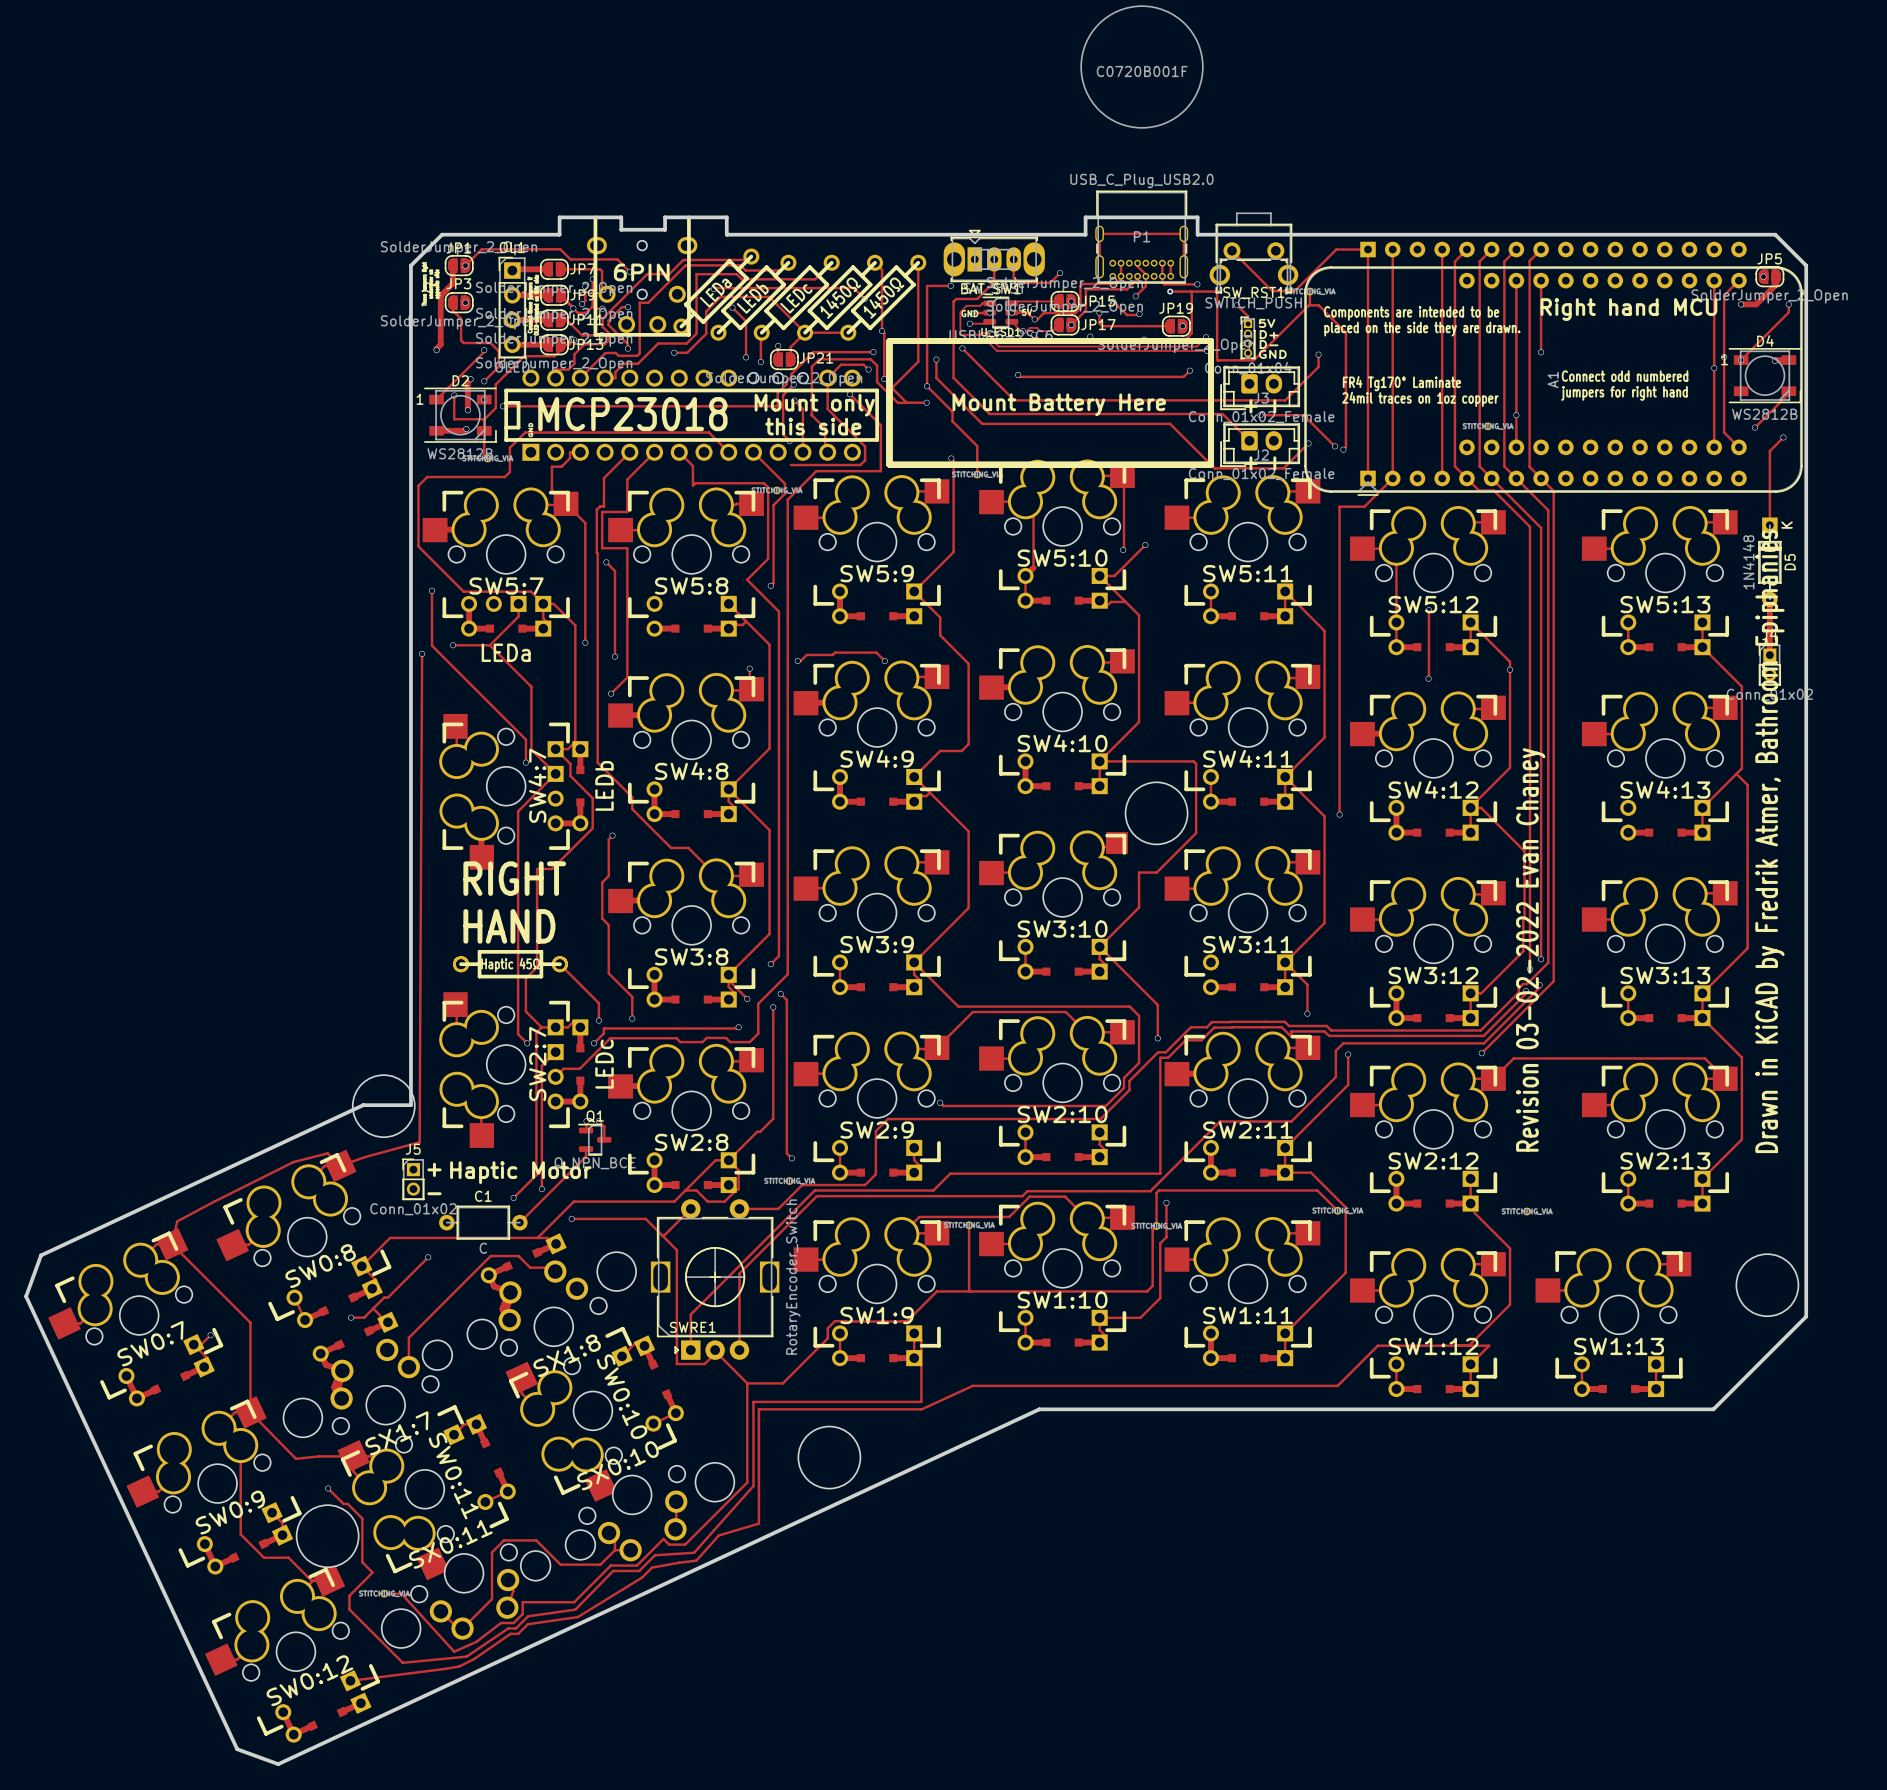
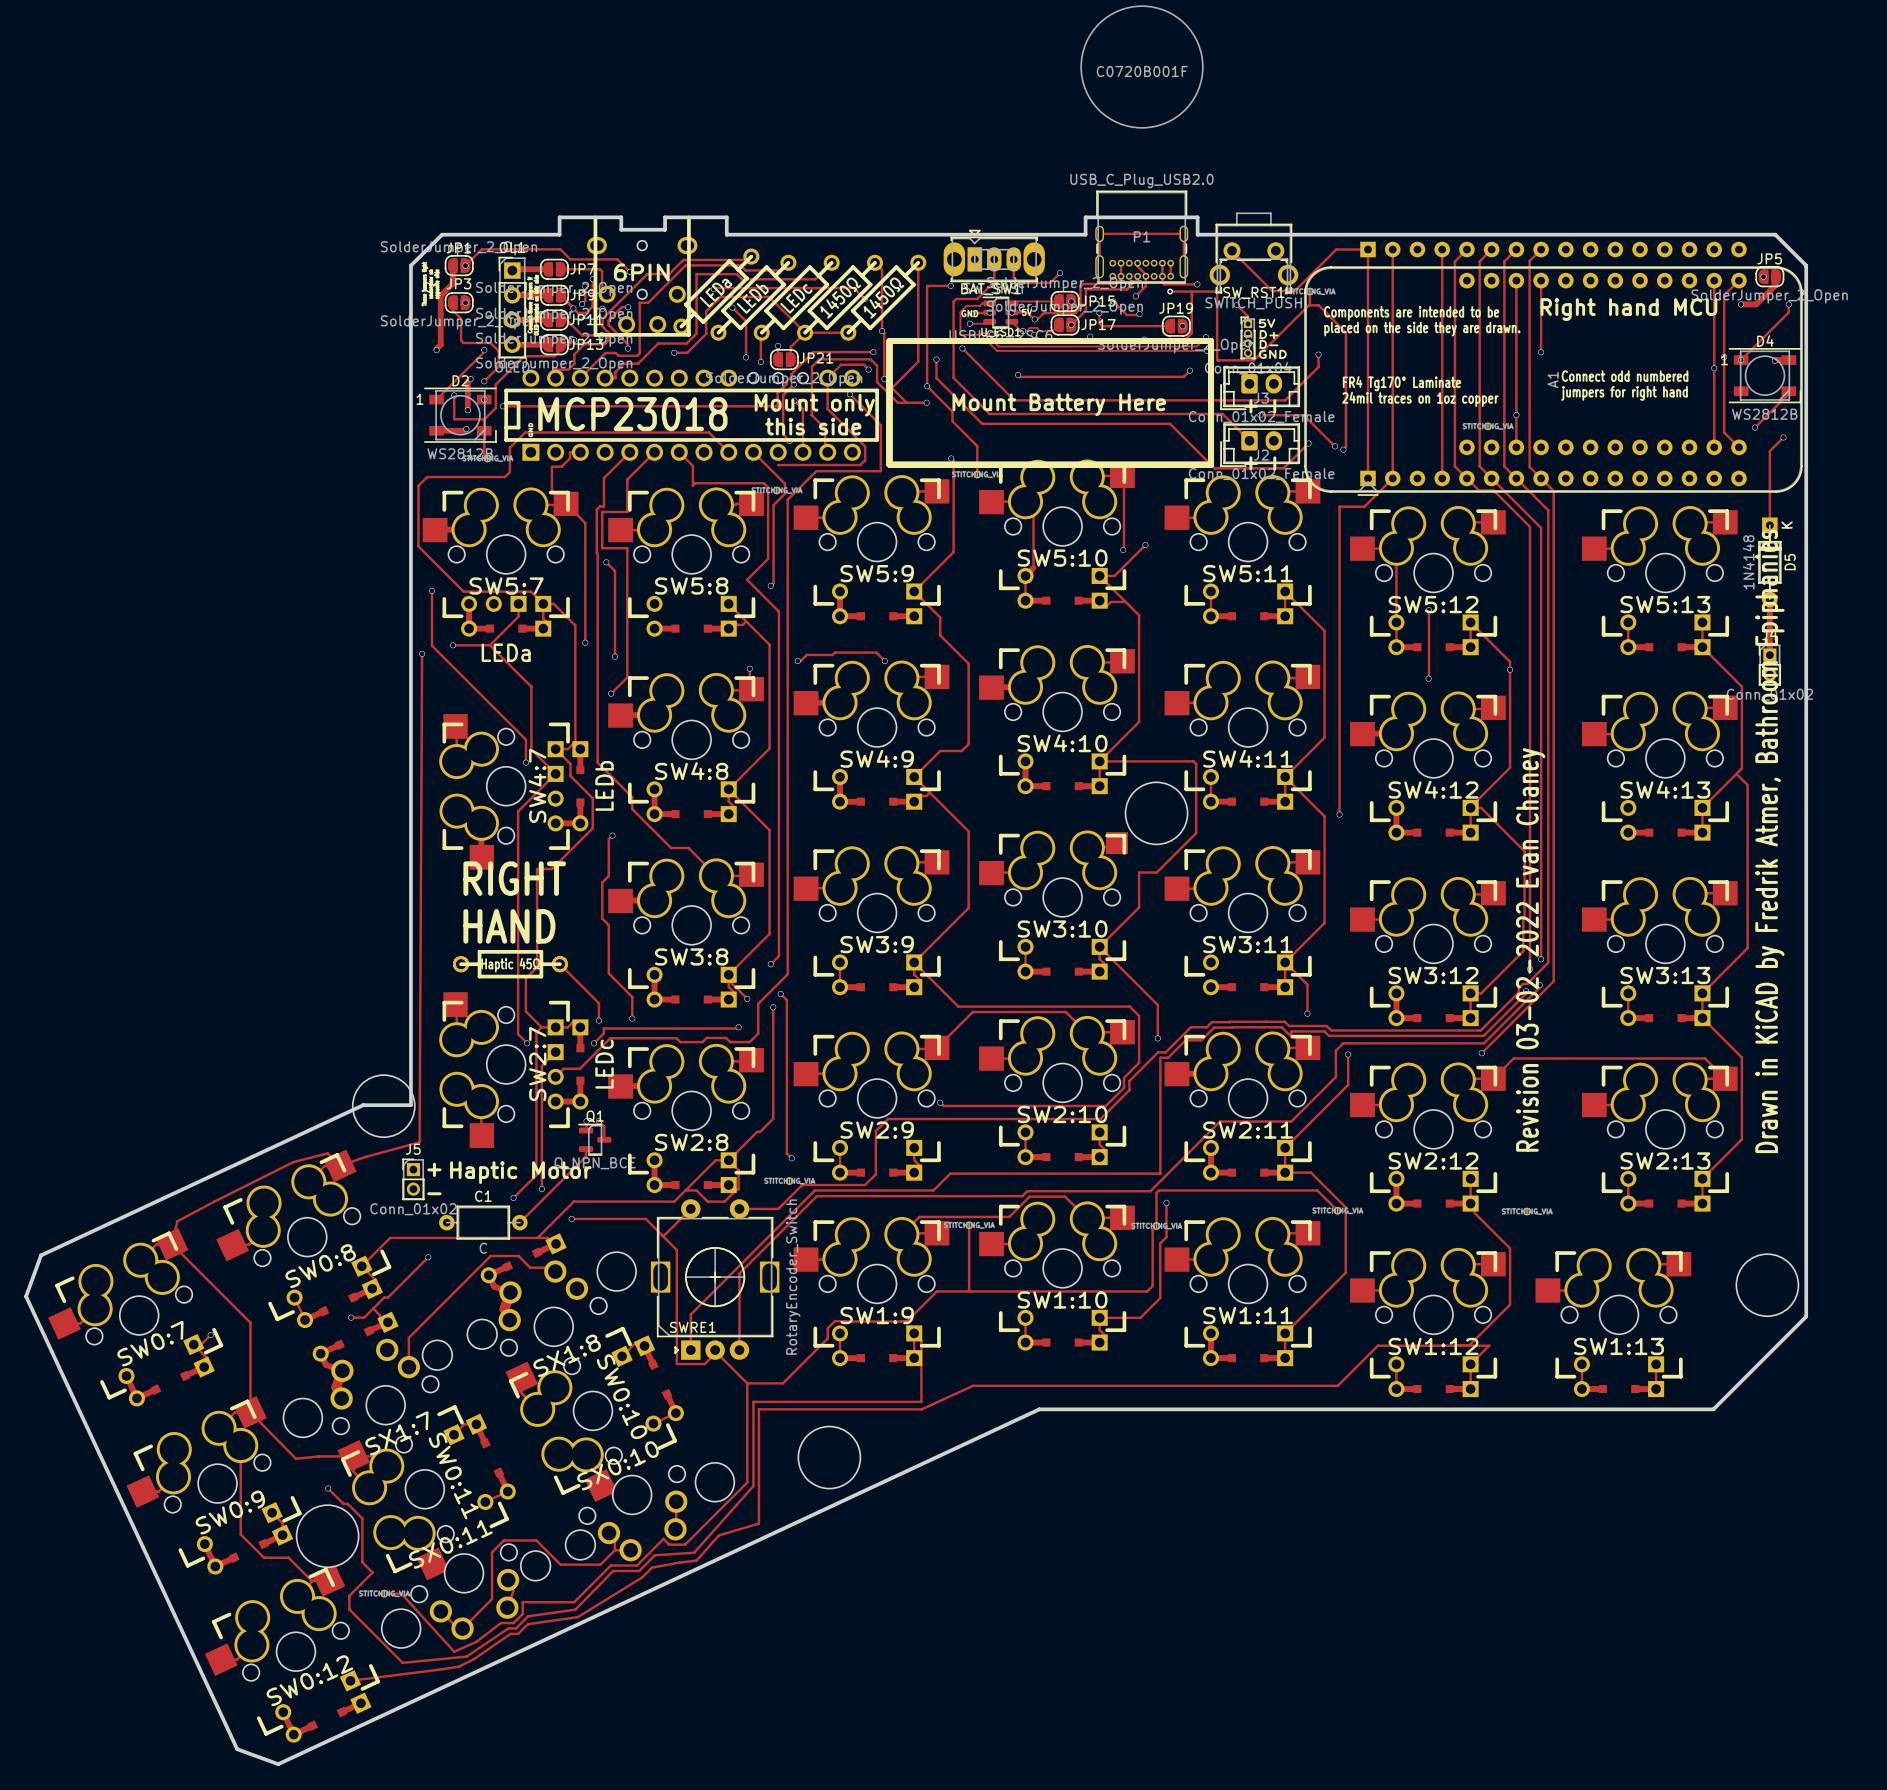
track: none -> (778, 465) (790, 465)

